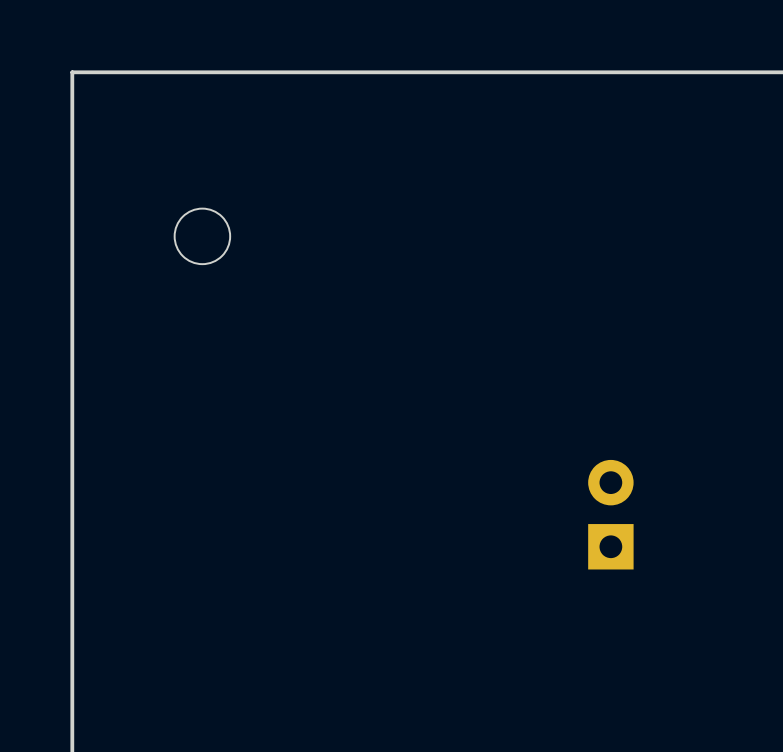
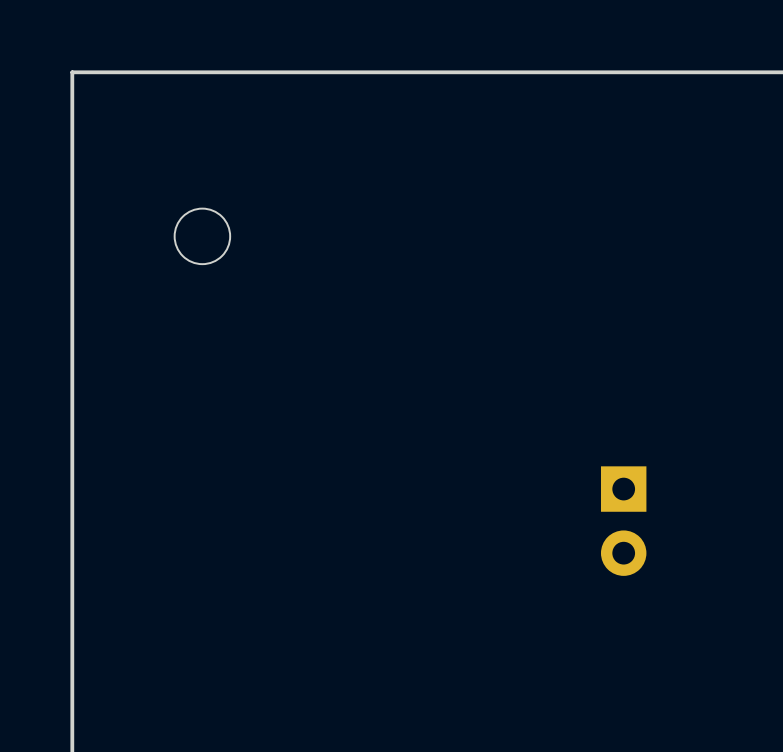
part rotation: 0° (610, 514) -> 180° (623, 521)

